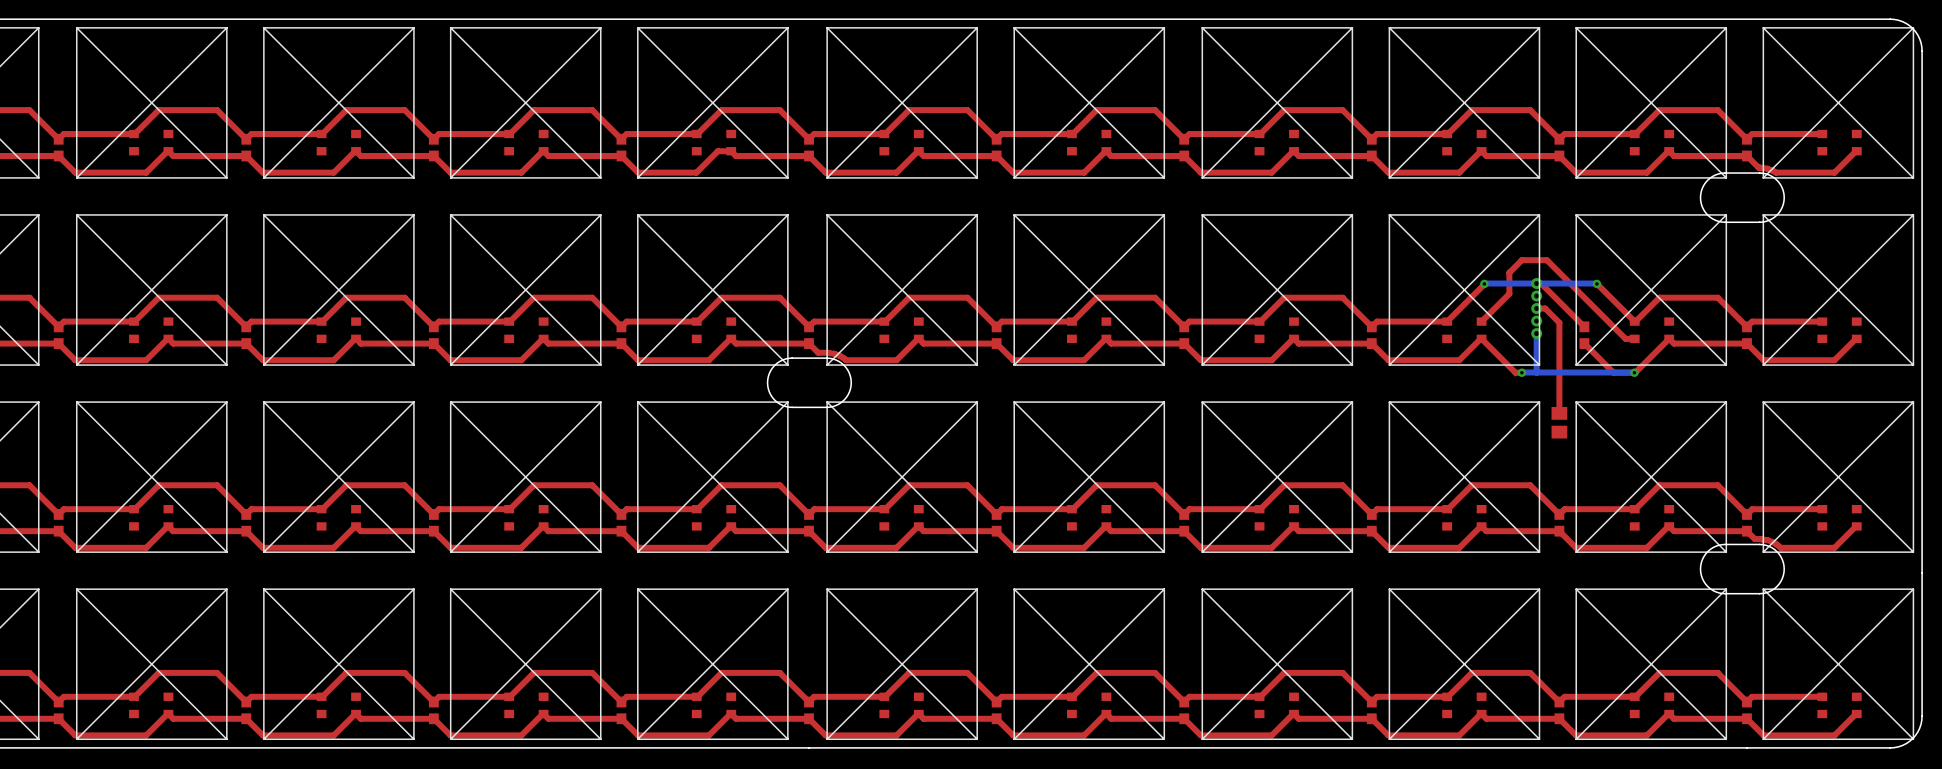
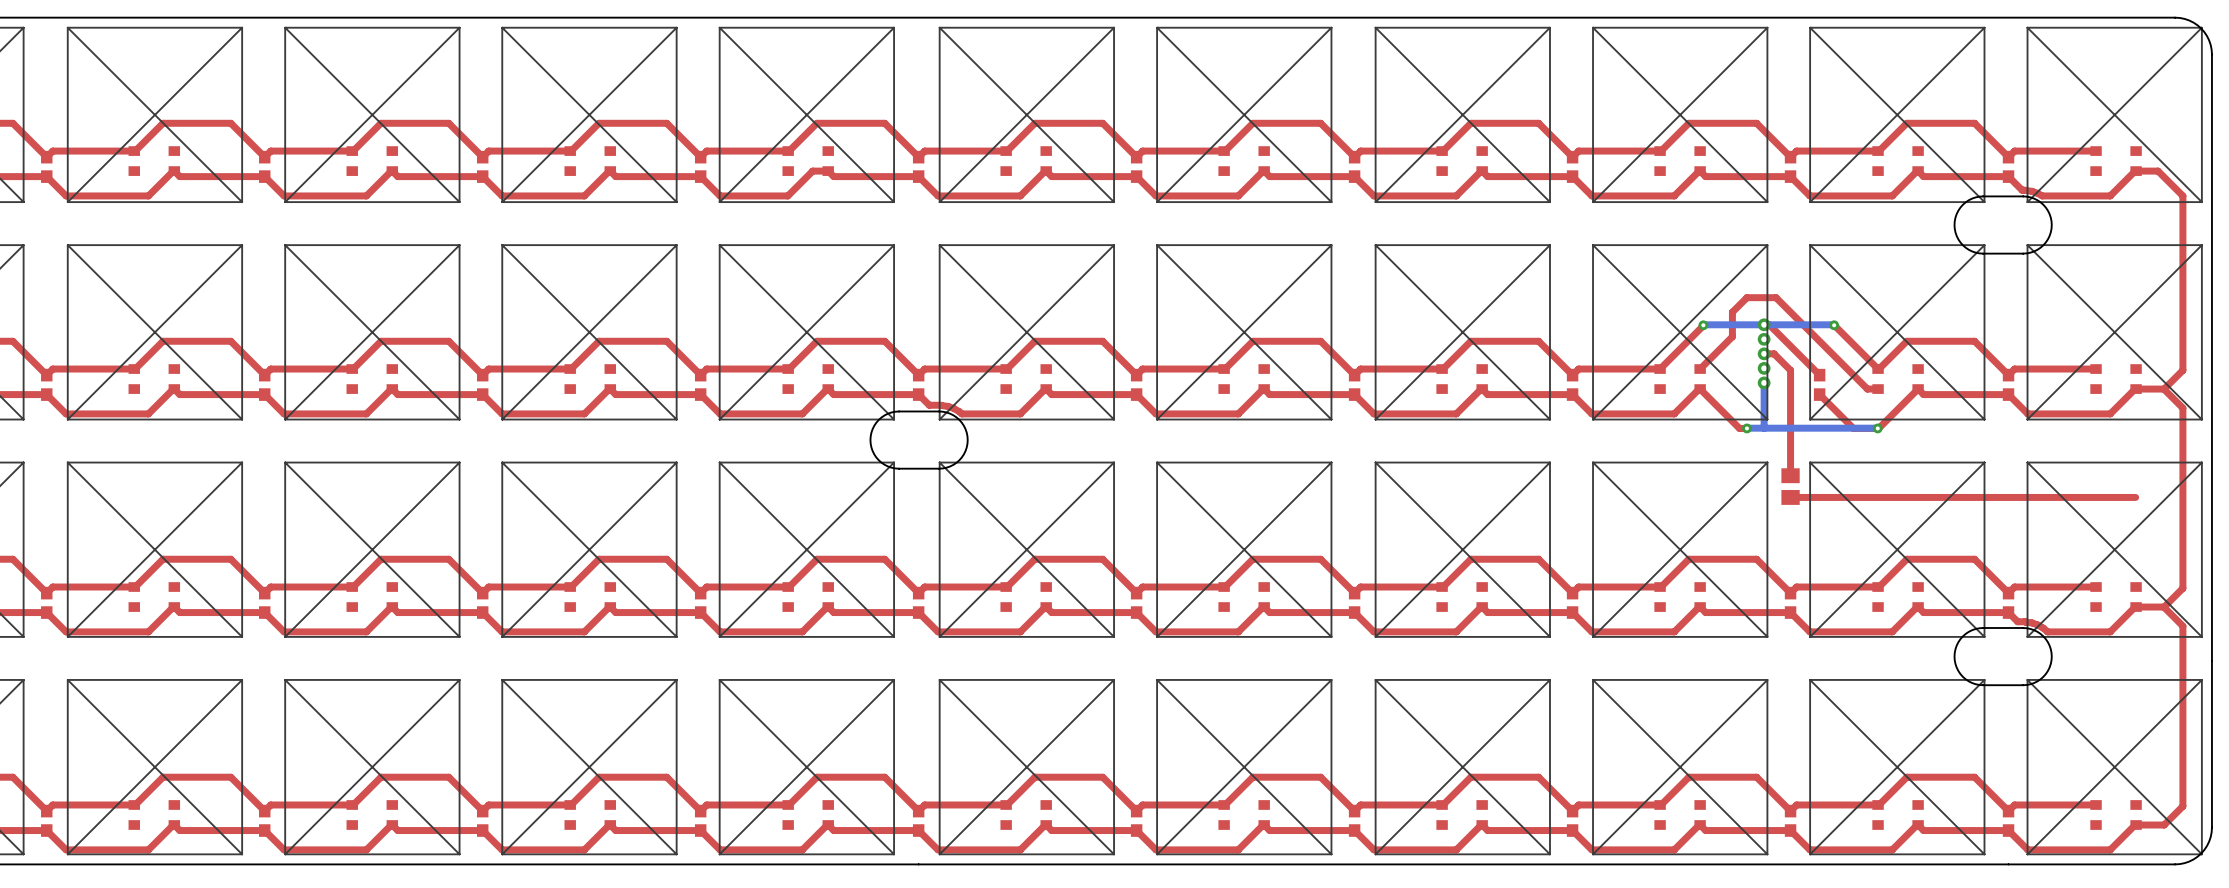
top track: none -> (2136, 171) (2158, 171) (2182, 195) (2182, 370) (2164, 389)
top track: none -> (2164, 389) (2136, 389)
top track: none -> (2164, 389) (2182, 408) (2182, 588) (2164, 607)
top track: none -> (2135, 497) (1790, 497)
top track: none -> (2164, 607) (2136, 607)
top track: none -> (2164, 607) (2182, 626) (2182, 806) (2164, 825) (2136, 825)

